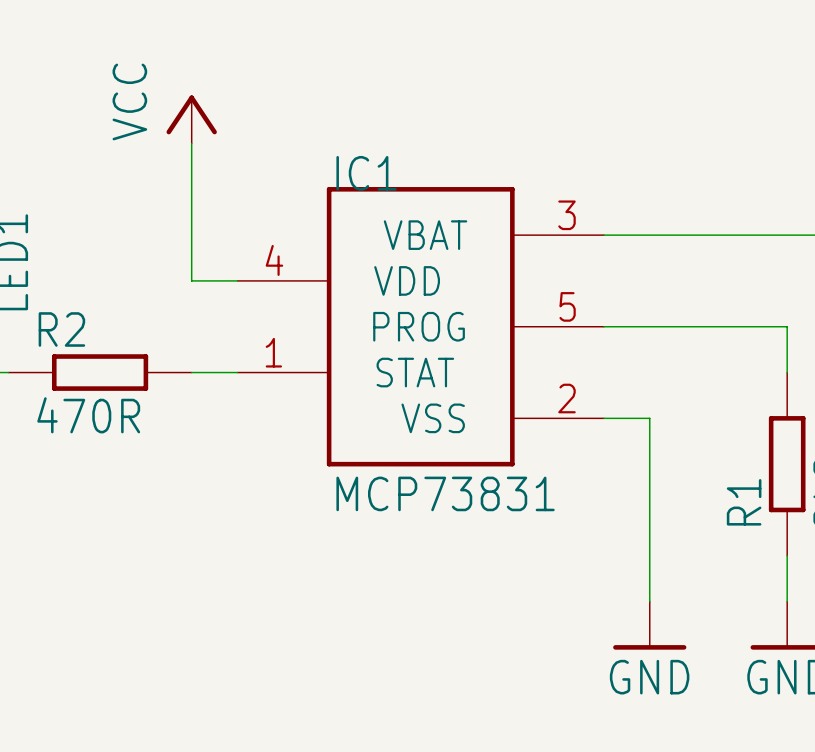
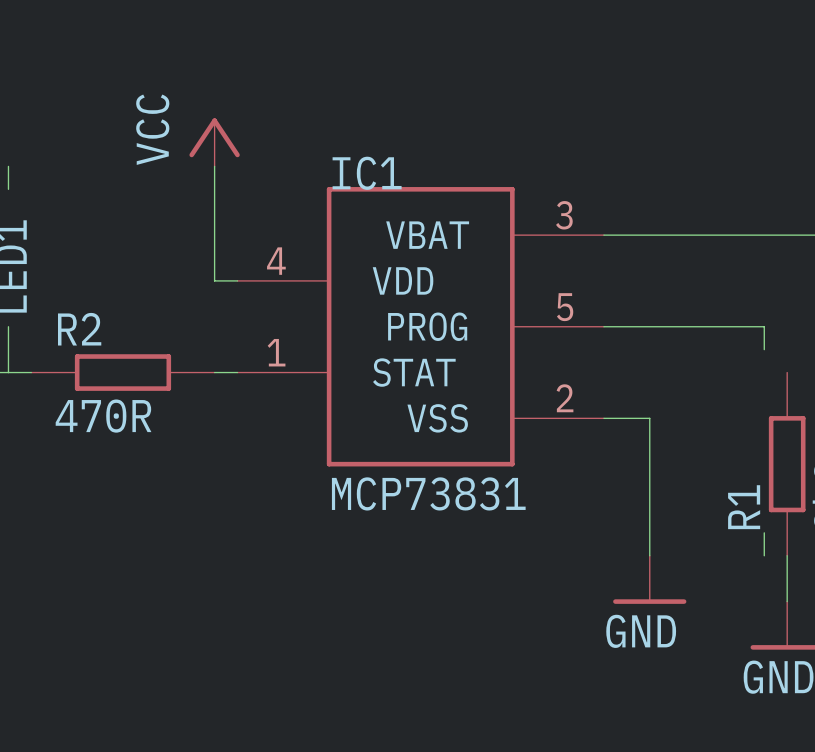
power symbol position: VCC (191, 119) -> VCC (214, 142)
wire: (191, 143) (191, 280) (214, 280) -> (214, 166) (214, 280)
wire: none -> (8, 166) (8, 189)
wire: none -> (8, 326) (8, 372) (31, 372)
wire: (764, 326) (787, 326) (787, 372) -> (764, 326) (764, 349)
R2 position: (100, 372) -> (122, 372)
wire: none -> (764, 532) (764, 555)
power symbol position: GND (649, 625) -> GND (649, 579)

